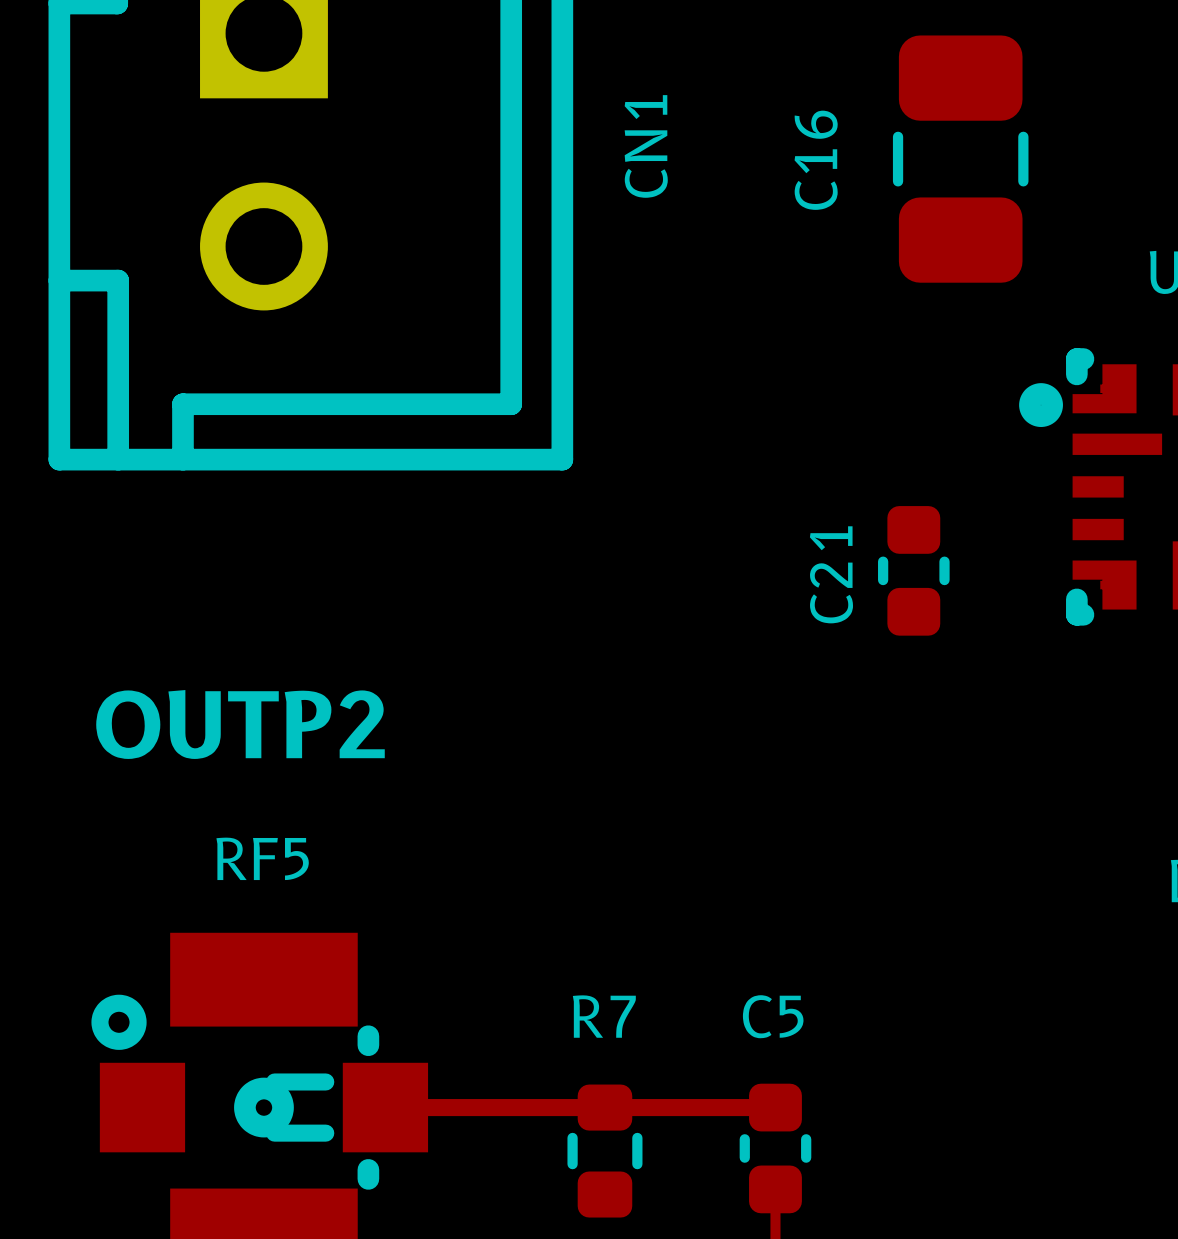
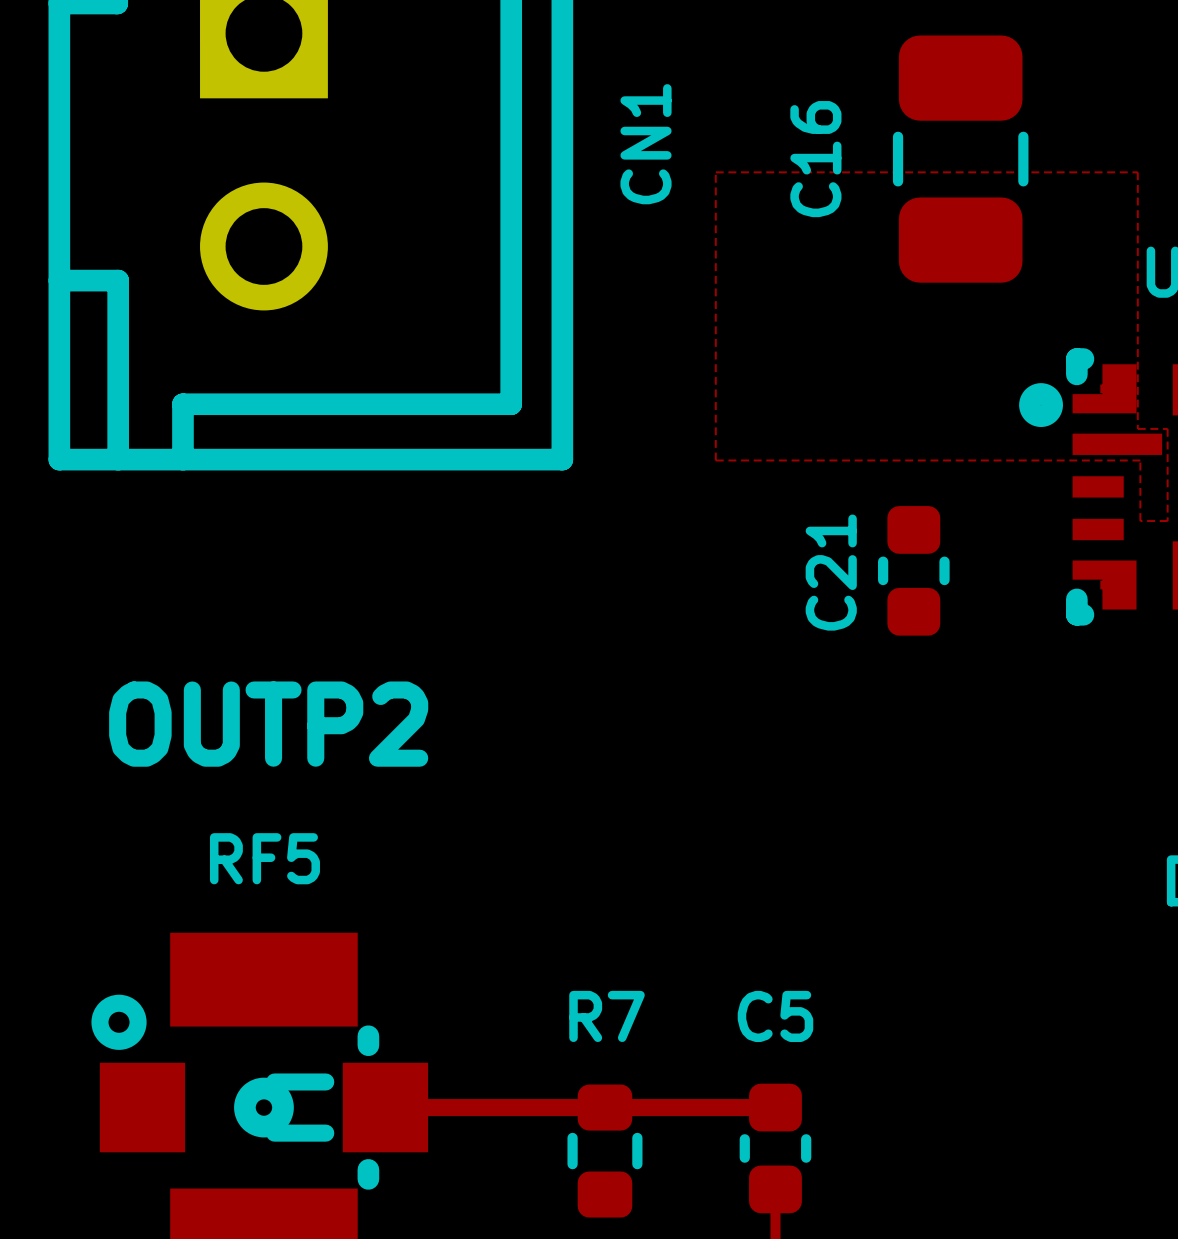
zone outline: none -> (715, 172) (1137, 172) (1137, 428) (1167, 428) (1167, 521) (1140, 521) (1140, 460) (715, 460) (715, 172)

